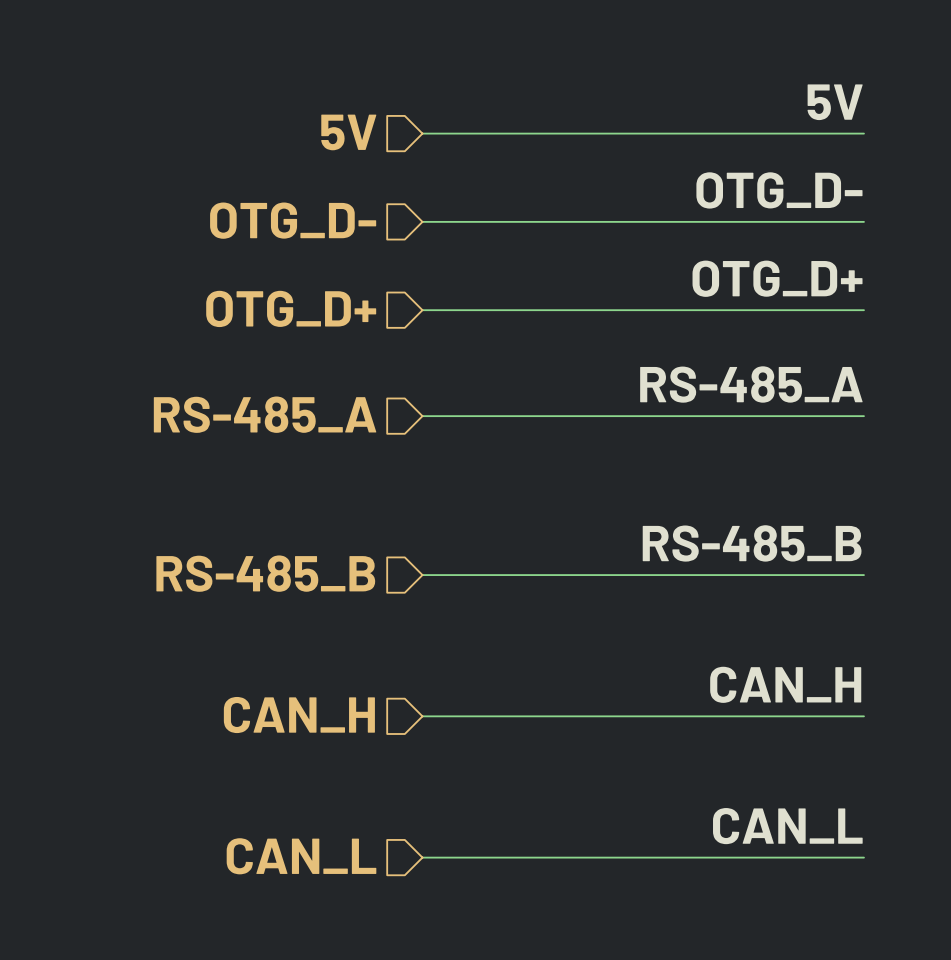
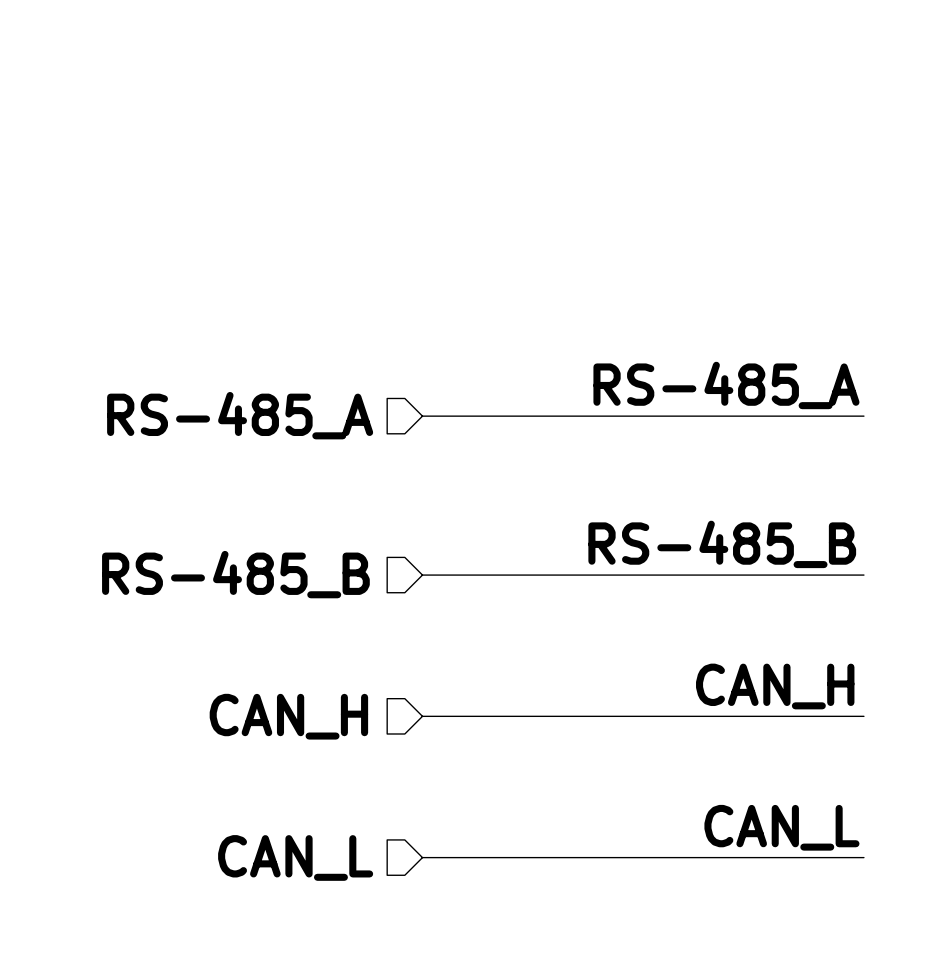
label: 5V (835, 102) -> none
hierarchical label: 5V (348, 132) -> none
wire: (422, 133) (863, 133) -> none
label: OTG_D- (779, 190) -> none
hierarchical label: OTG_D- (293, 220) -> none
wire: (422, 221) (863, 221) -> none
label: OTG_D+ (777, 278) -> none
hierarchical label: OTG_D+ (291, 308) -> none
wire: (422, 310) (863, 310) -> none

